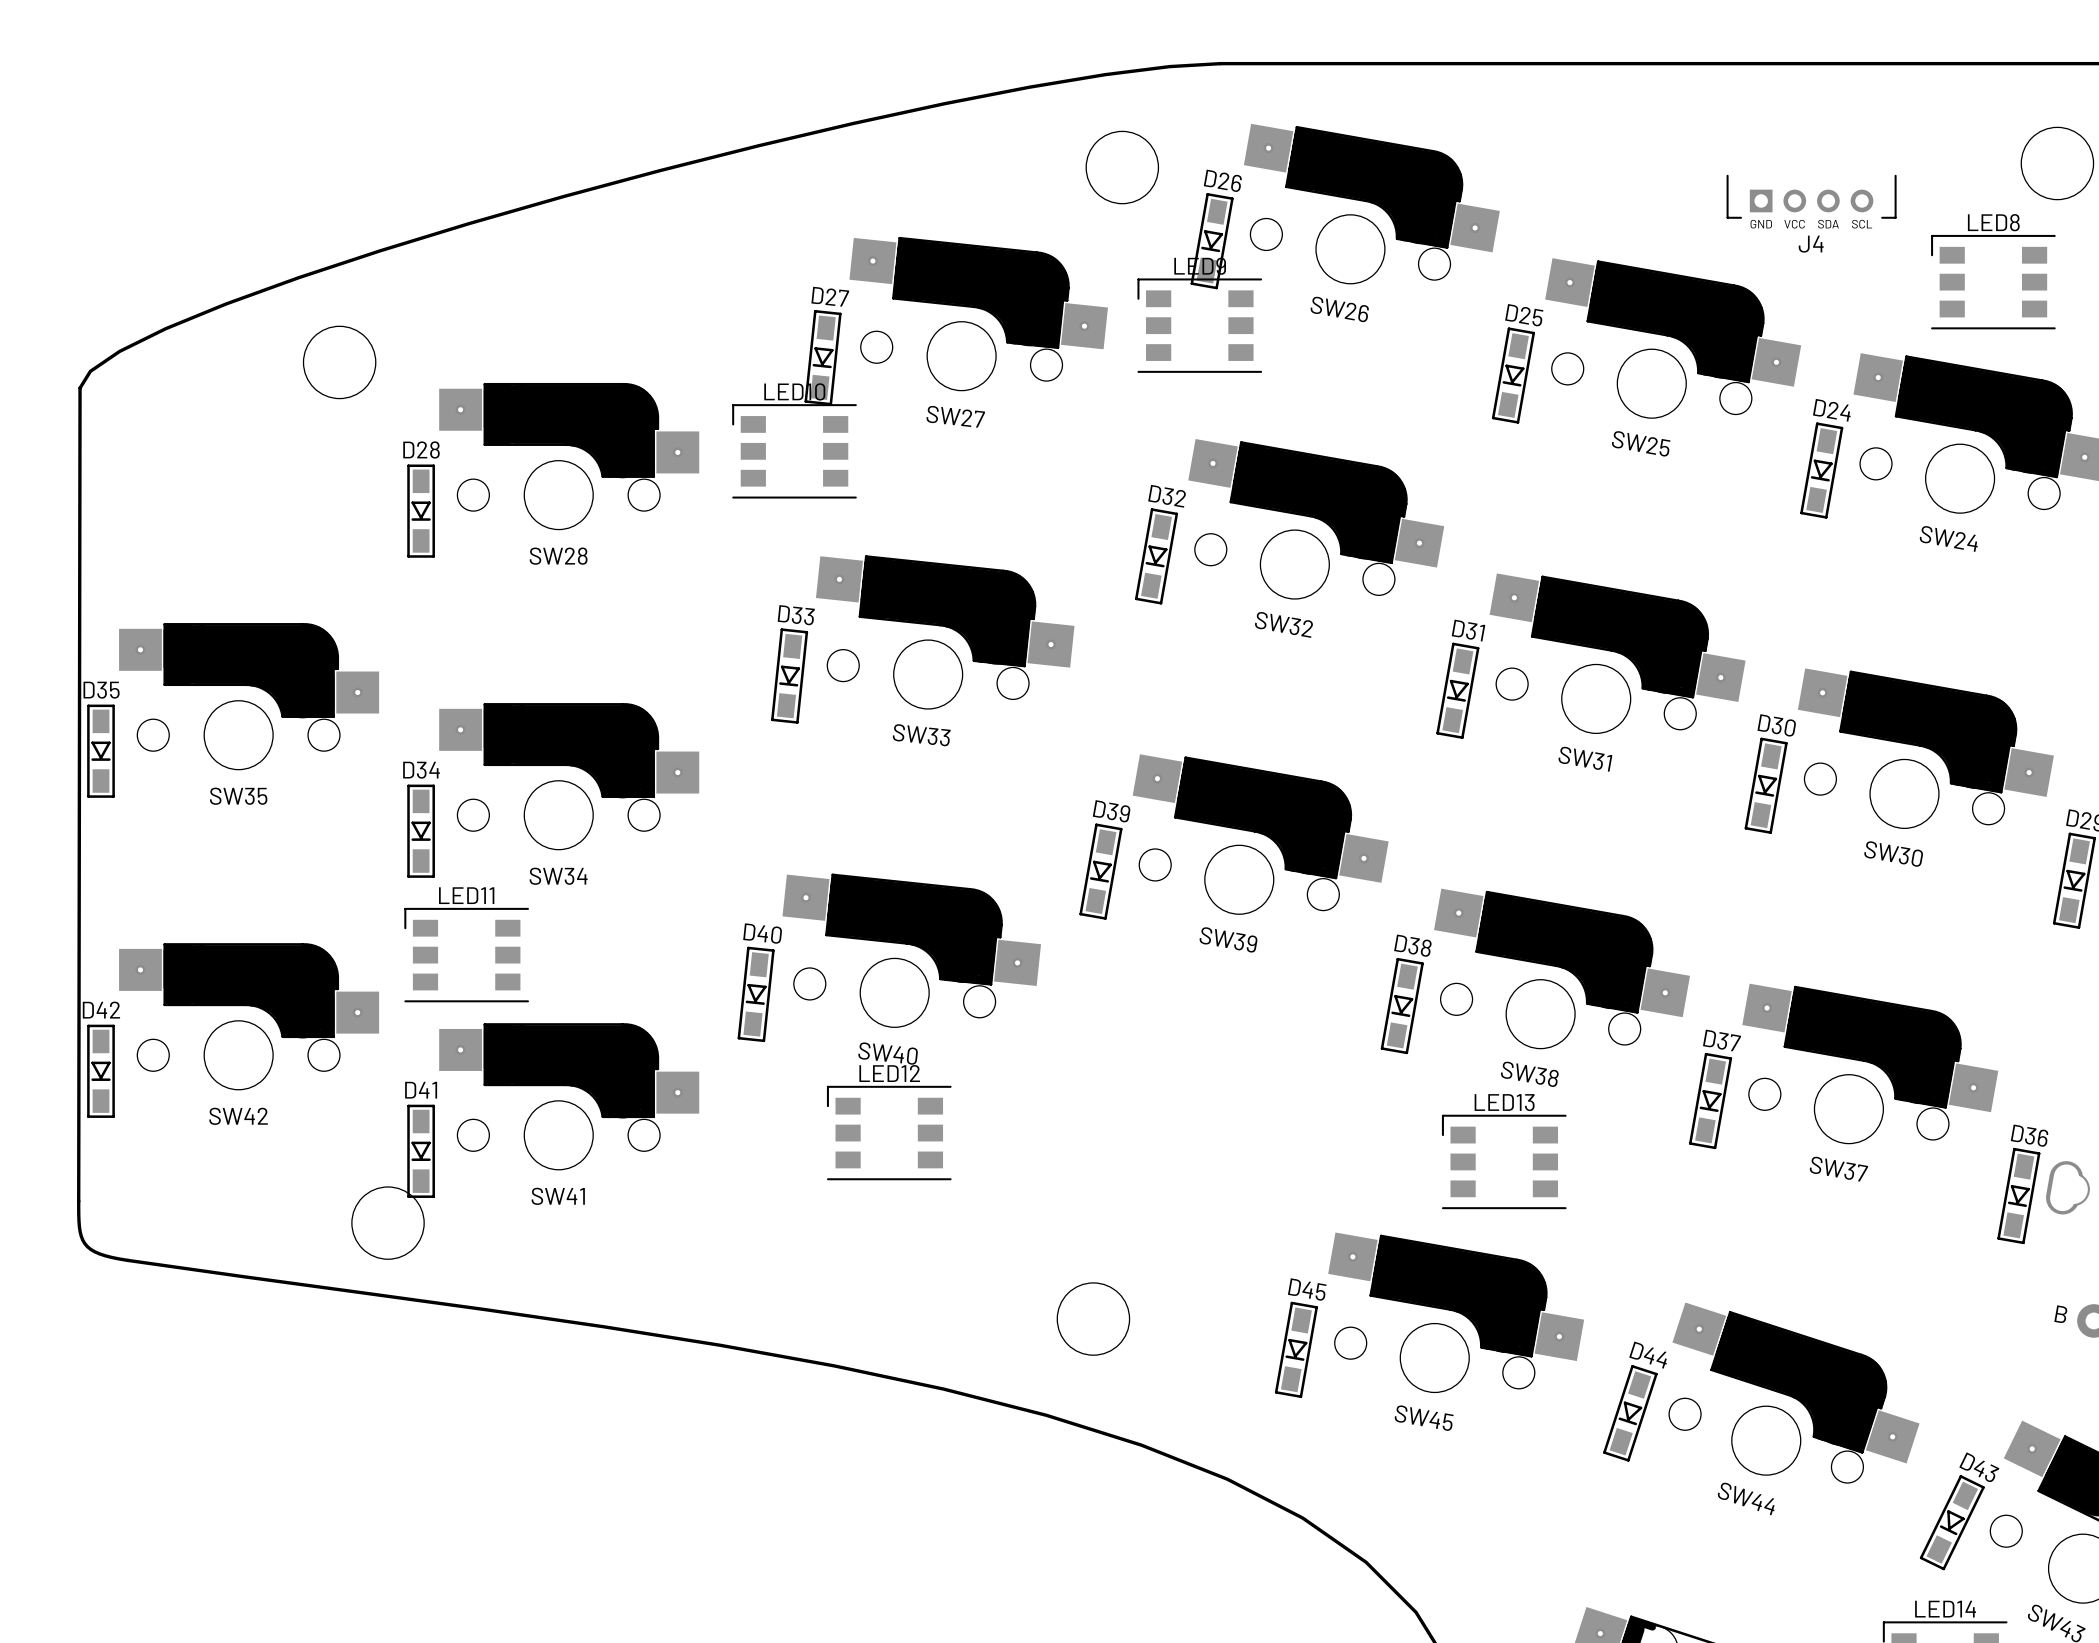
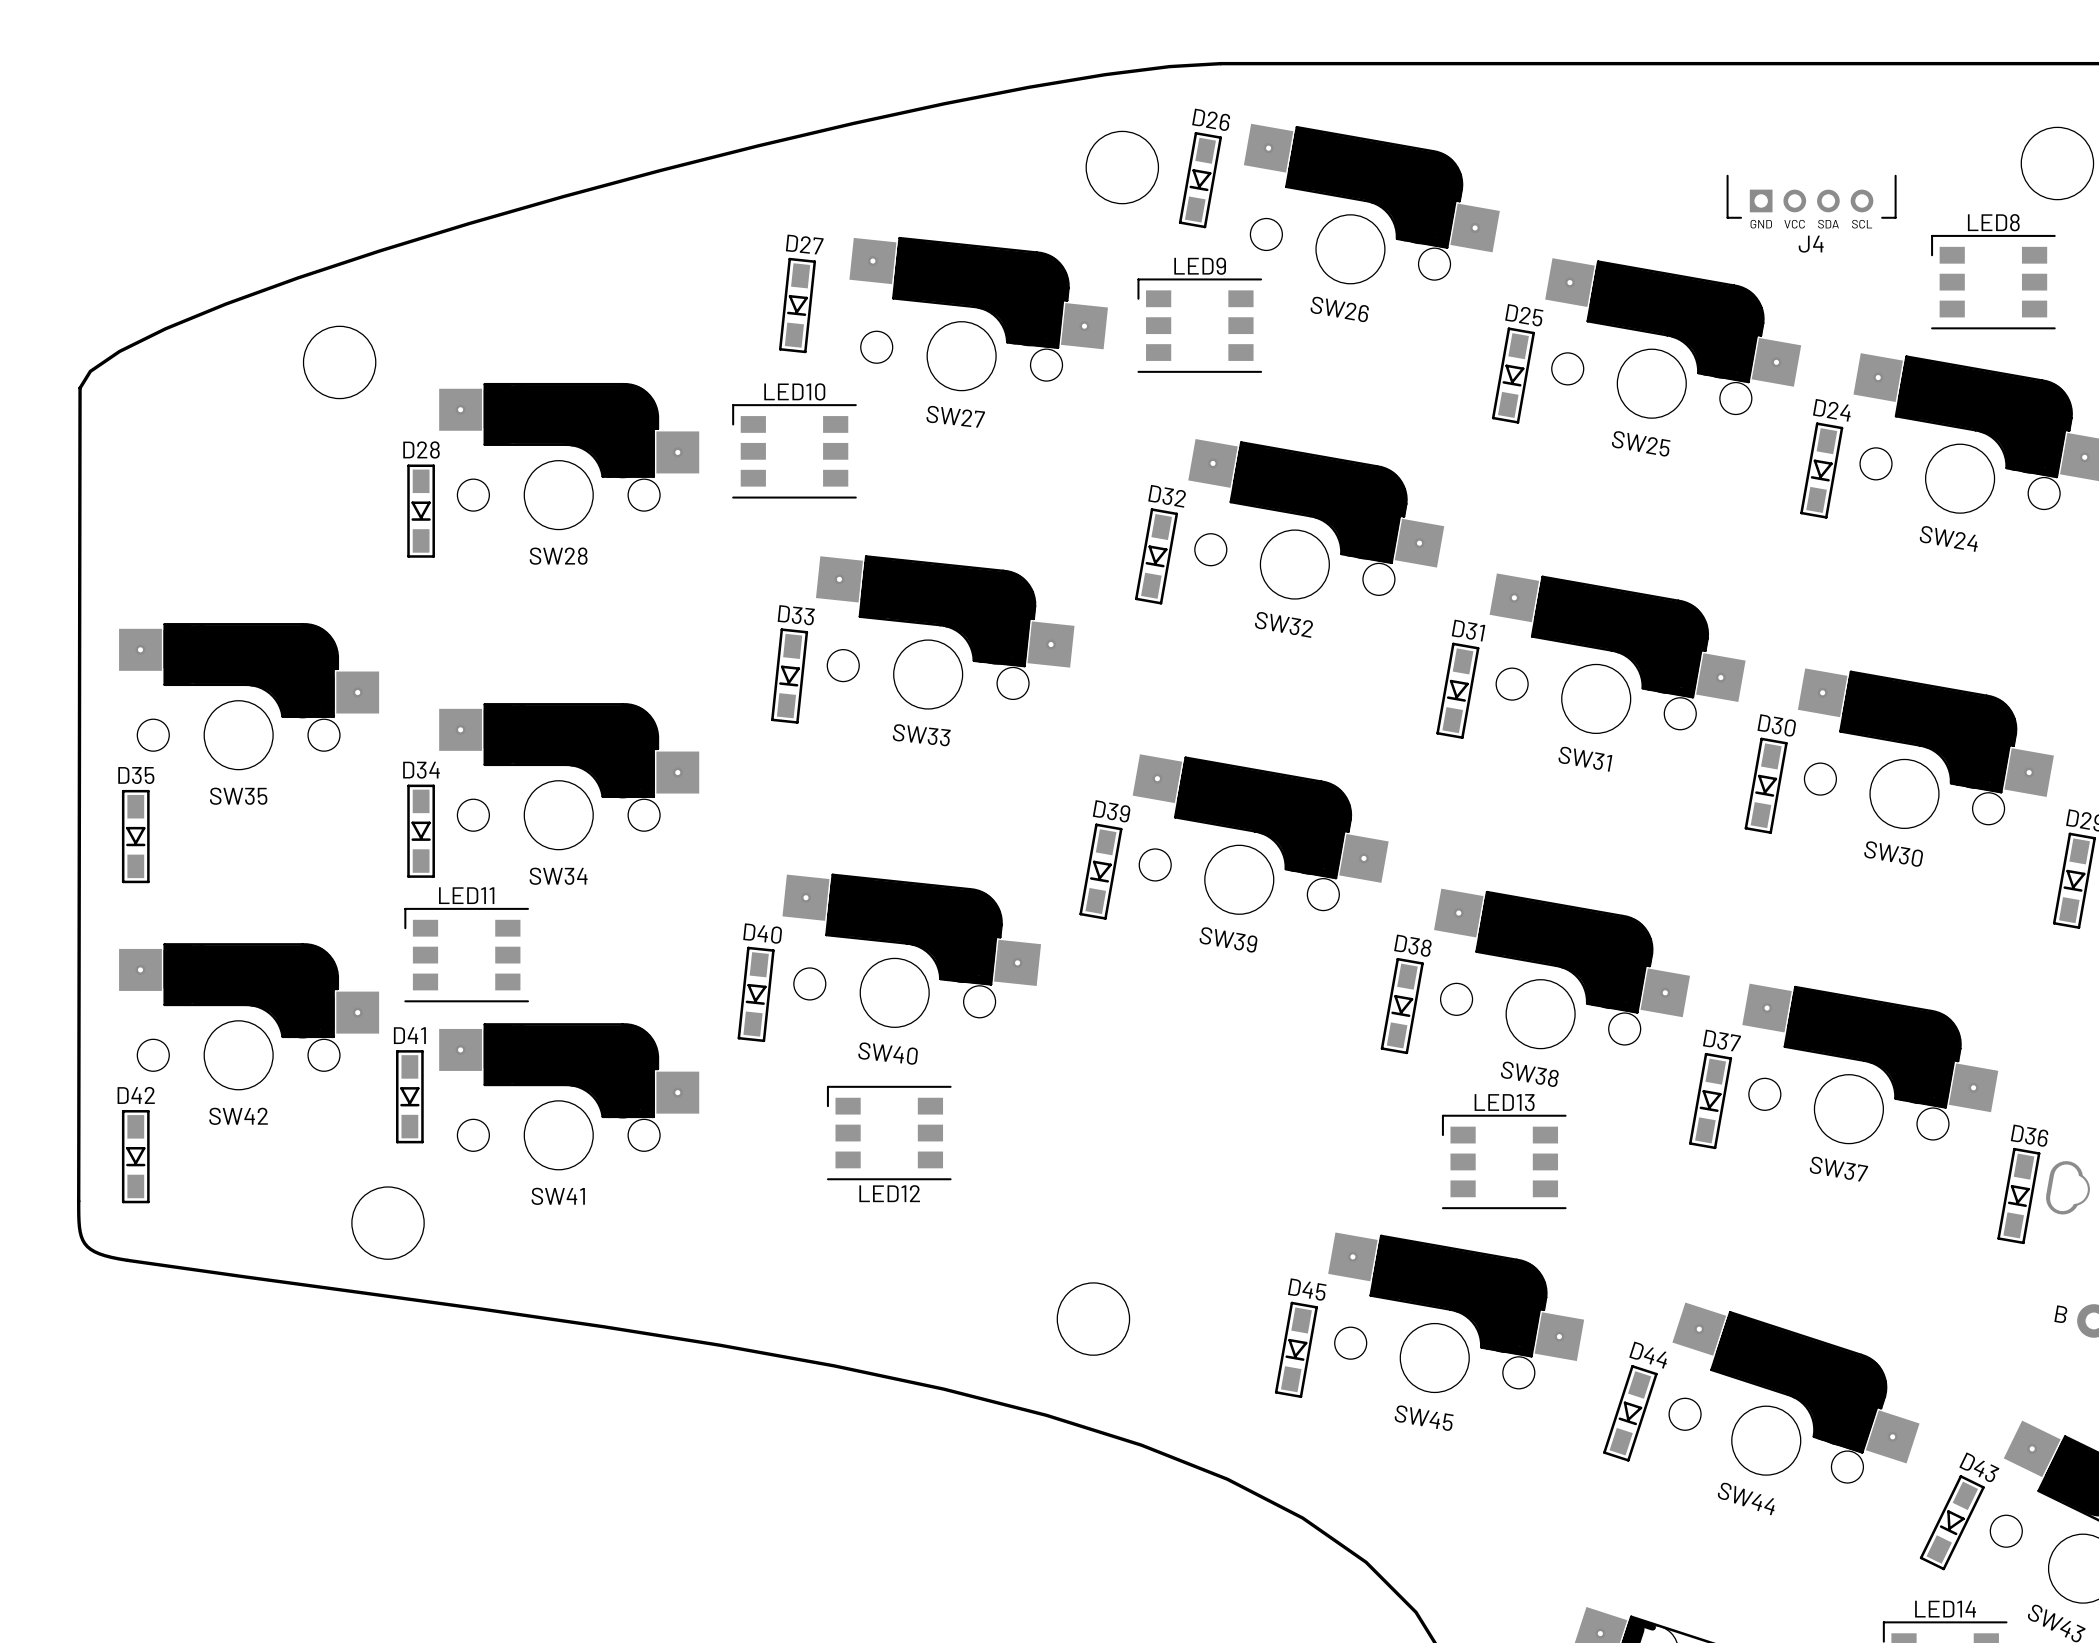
D26 position: (1212, 241) -> (1200, 180)
D27 position: (823, 357) -> (797, 305)
D35 position: (101, 751) -> (135, 836)
D42 position: (101, 1071) -> (135, 1156)
LED12 name position: LED12 (889, 1073) -> LED12 (889, 1193)
D41 position: (421, 1151) -> (409, 1096)

